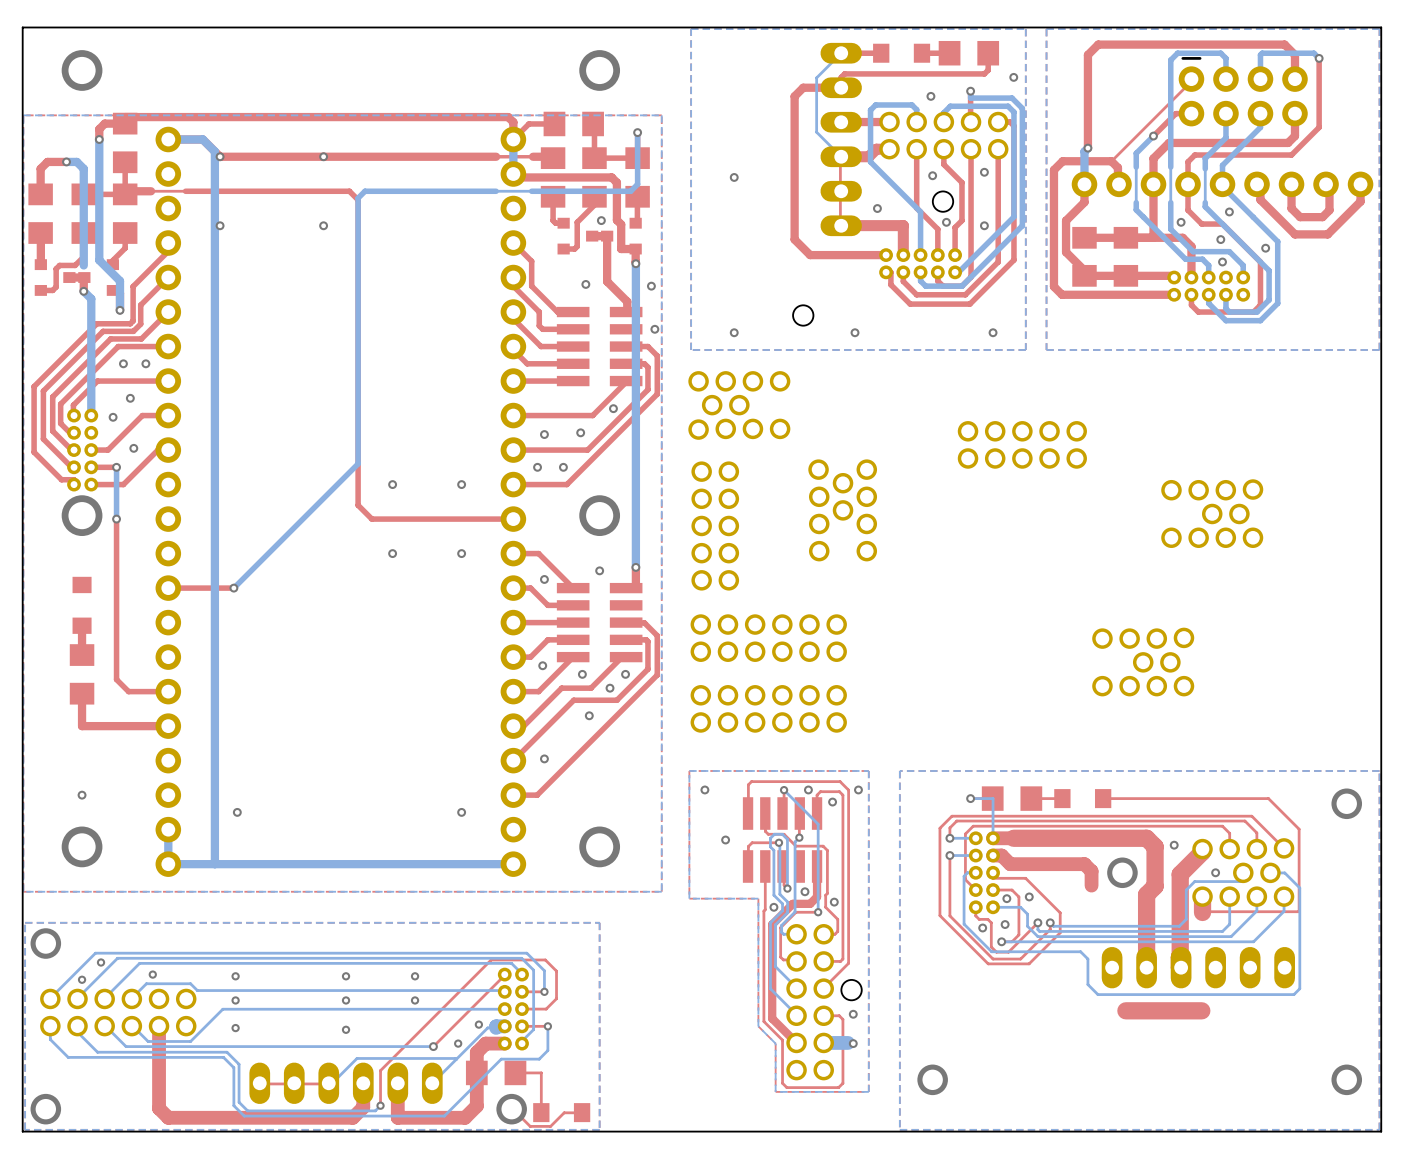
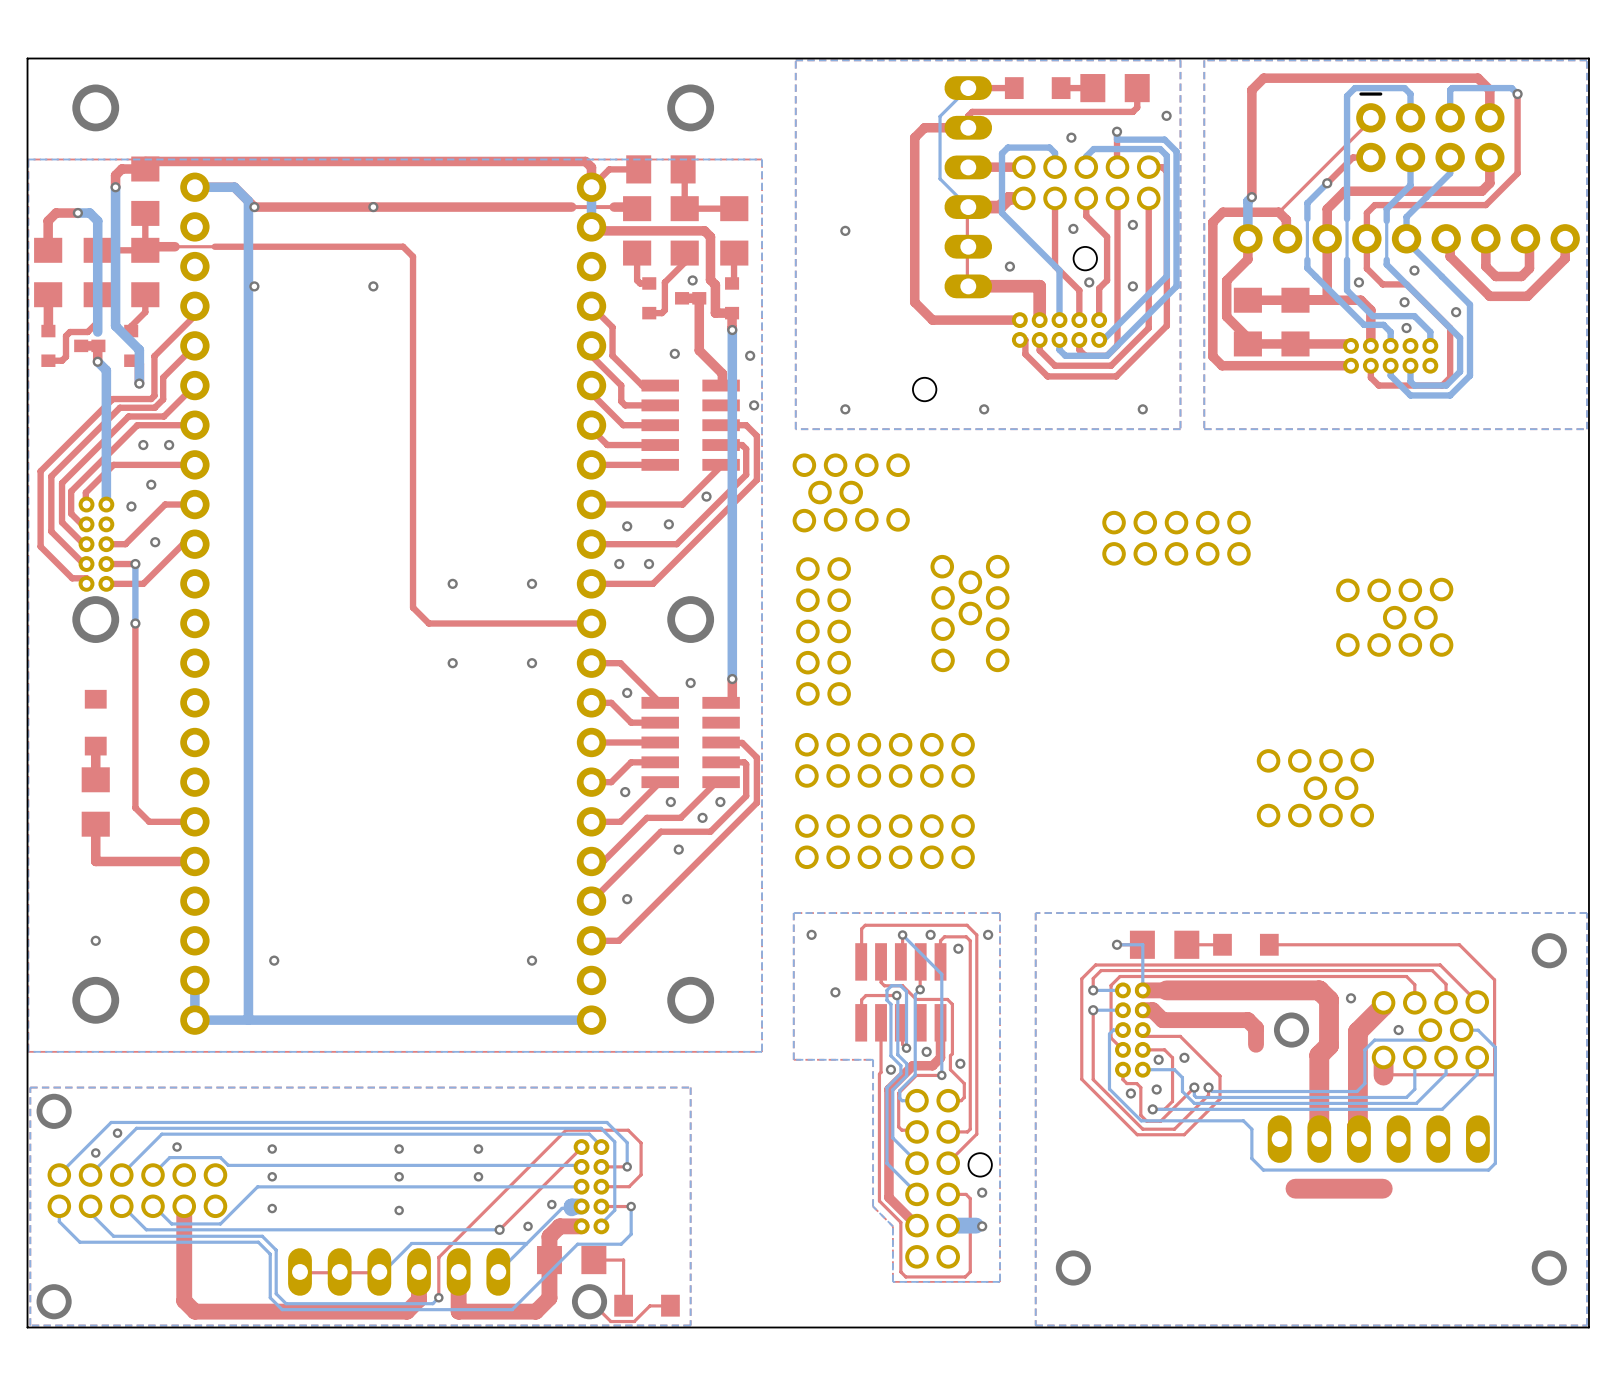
bottom track: (637, 132) (637, 184) (630, 191) (365, 191) (358, 198) (358, 463) (233, 588) -> none
via: (637, 132) -> none
top track: (233, 588) (168, 588) -> none
via: (233, 588) -> none

